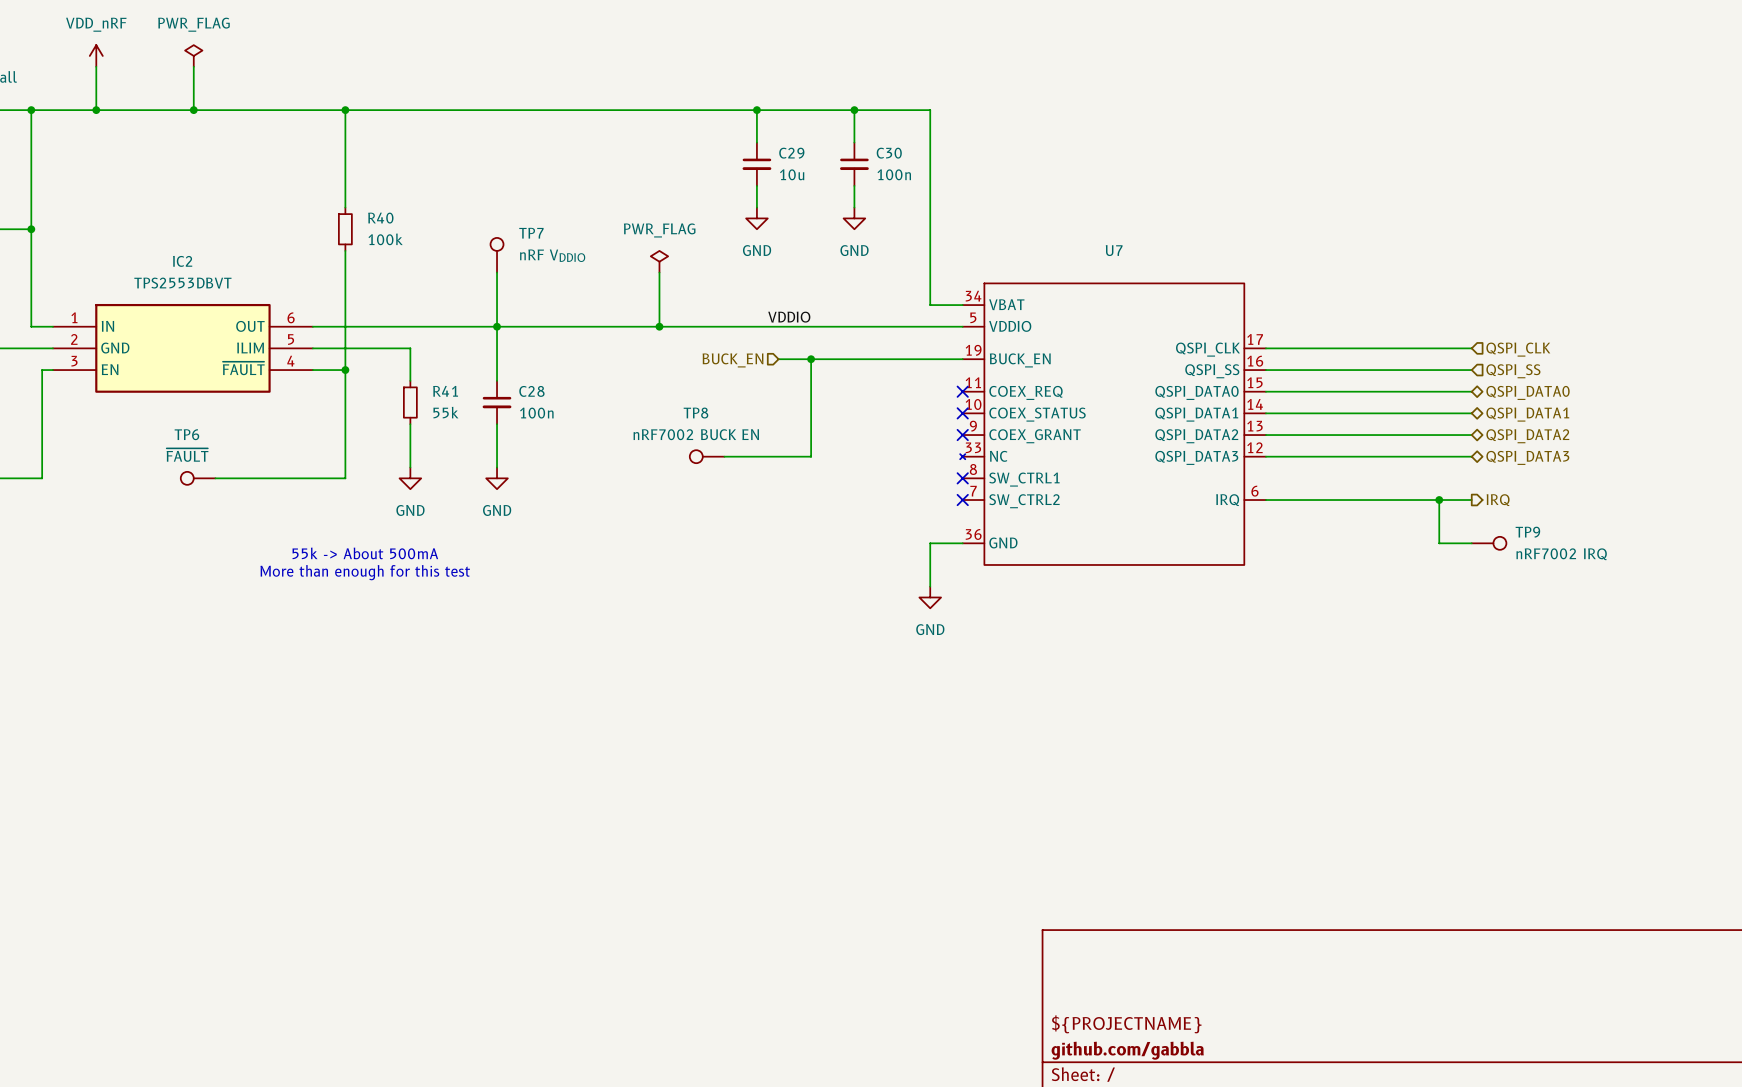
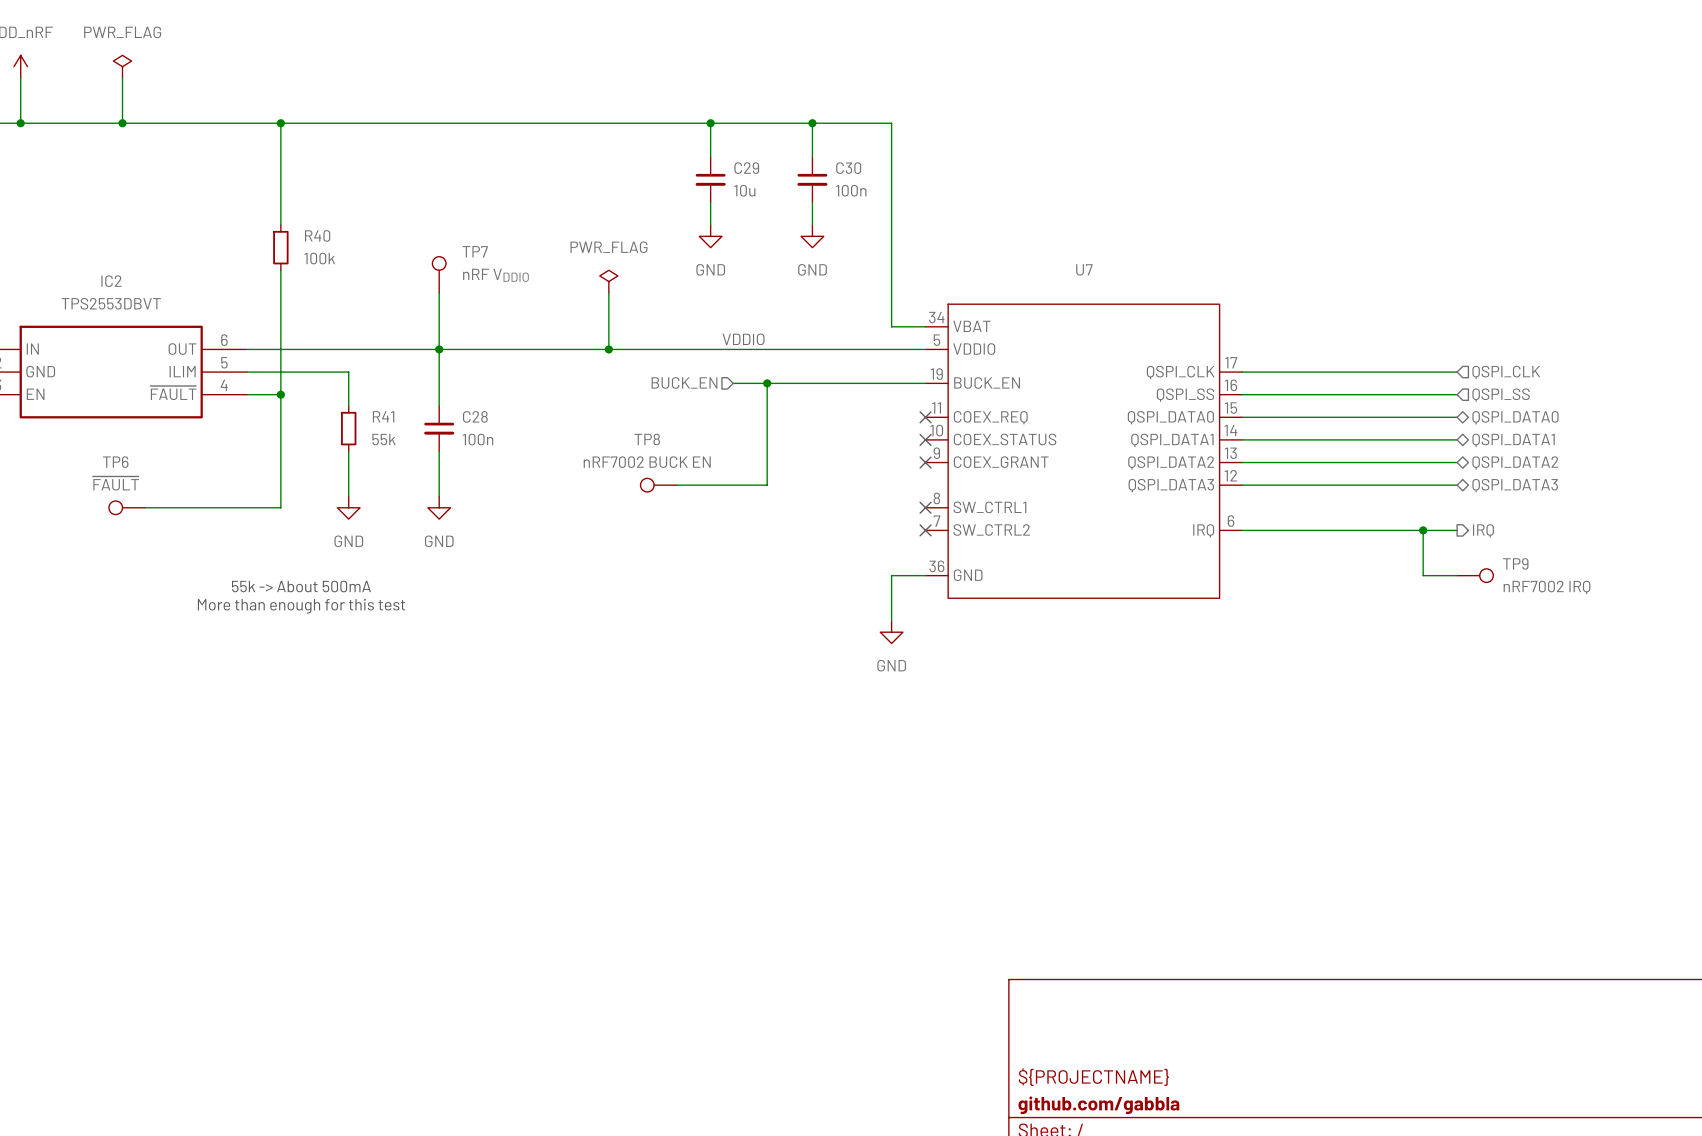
U7 symbol: [960, 283, 1266, 565] -> [925, 304, 1243, 599]

